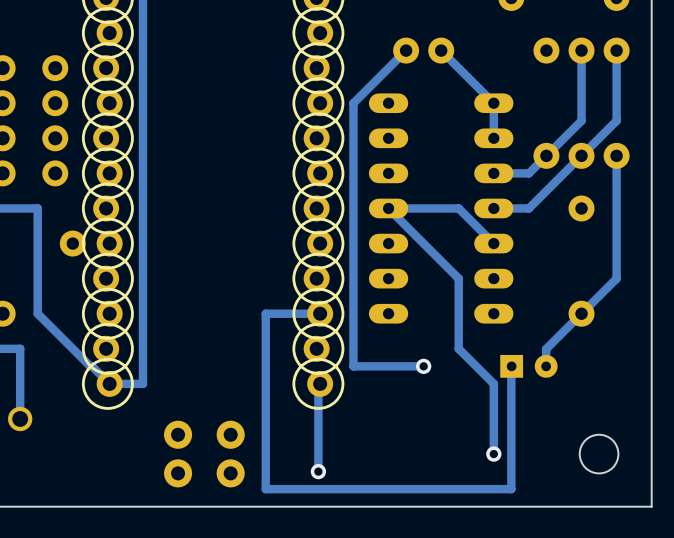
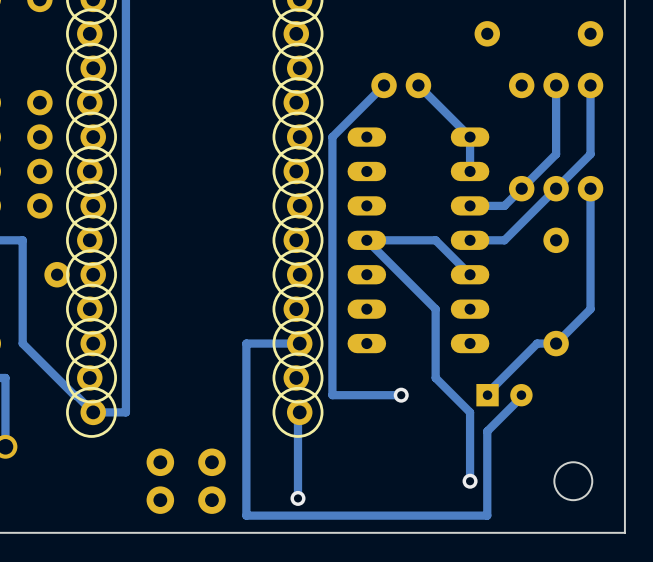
track: (581, 313) (546, 349) (546, 366) -> (556, 343) (537, 343) (485, 395)
track: (511, 366) (511, 403) -> (523, 395) (487, 431)

